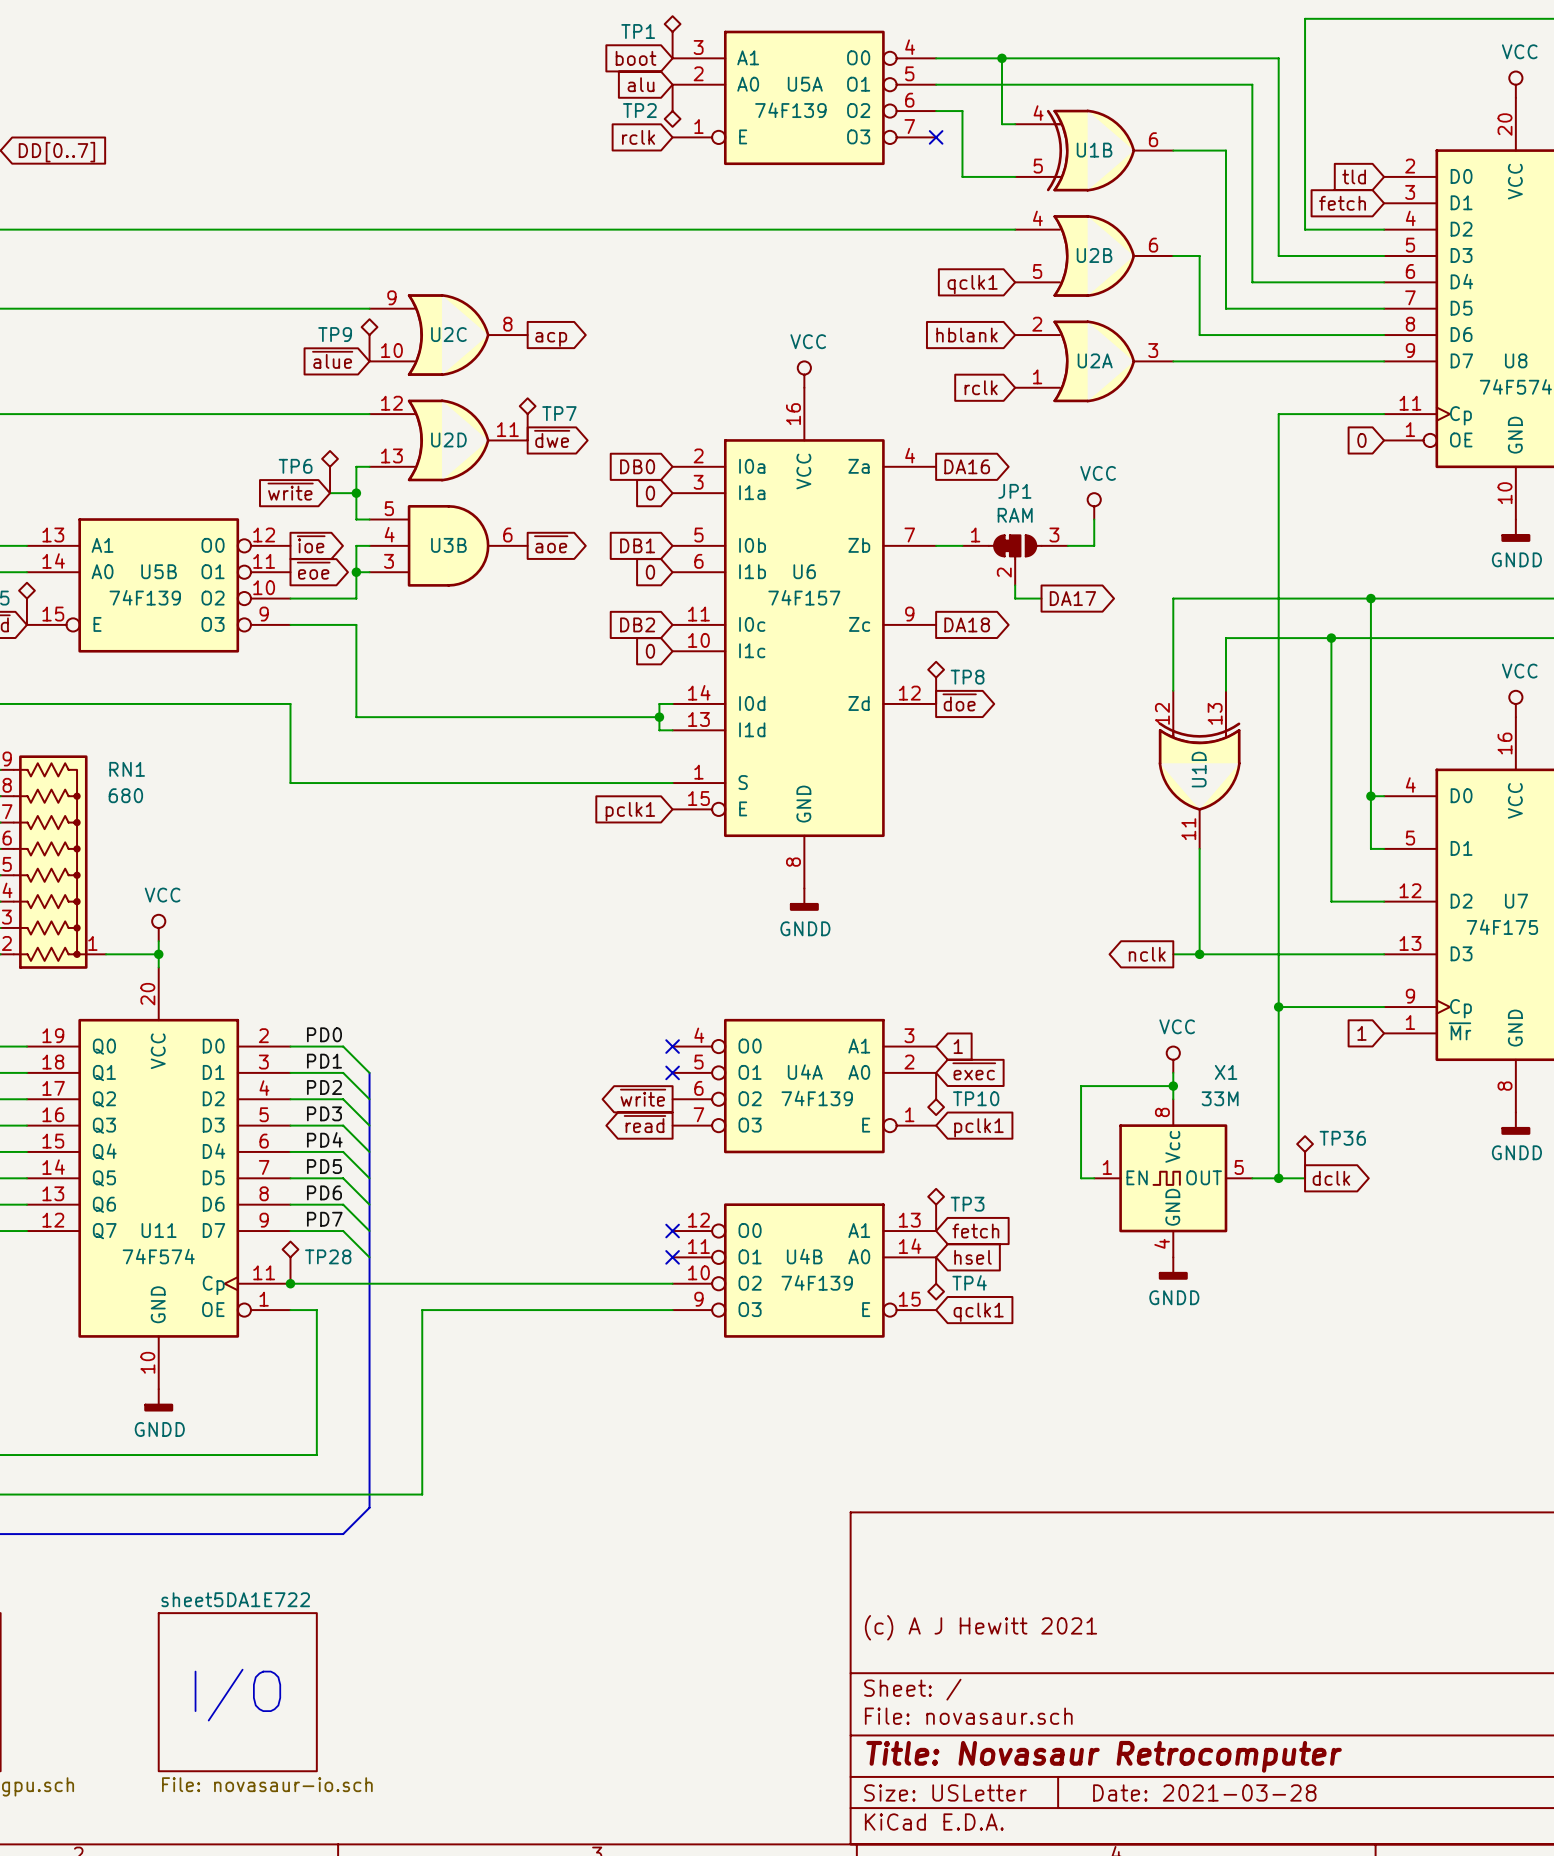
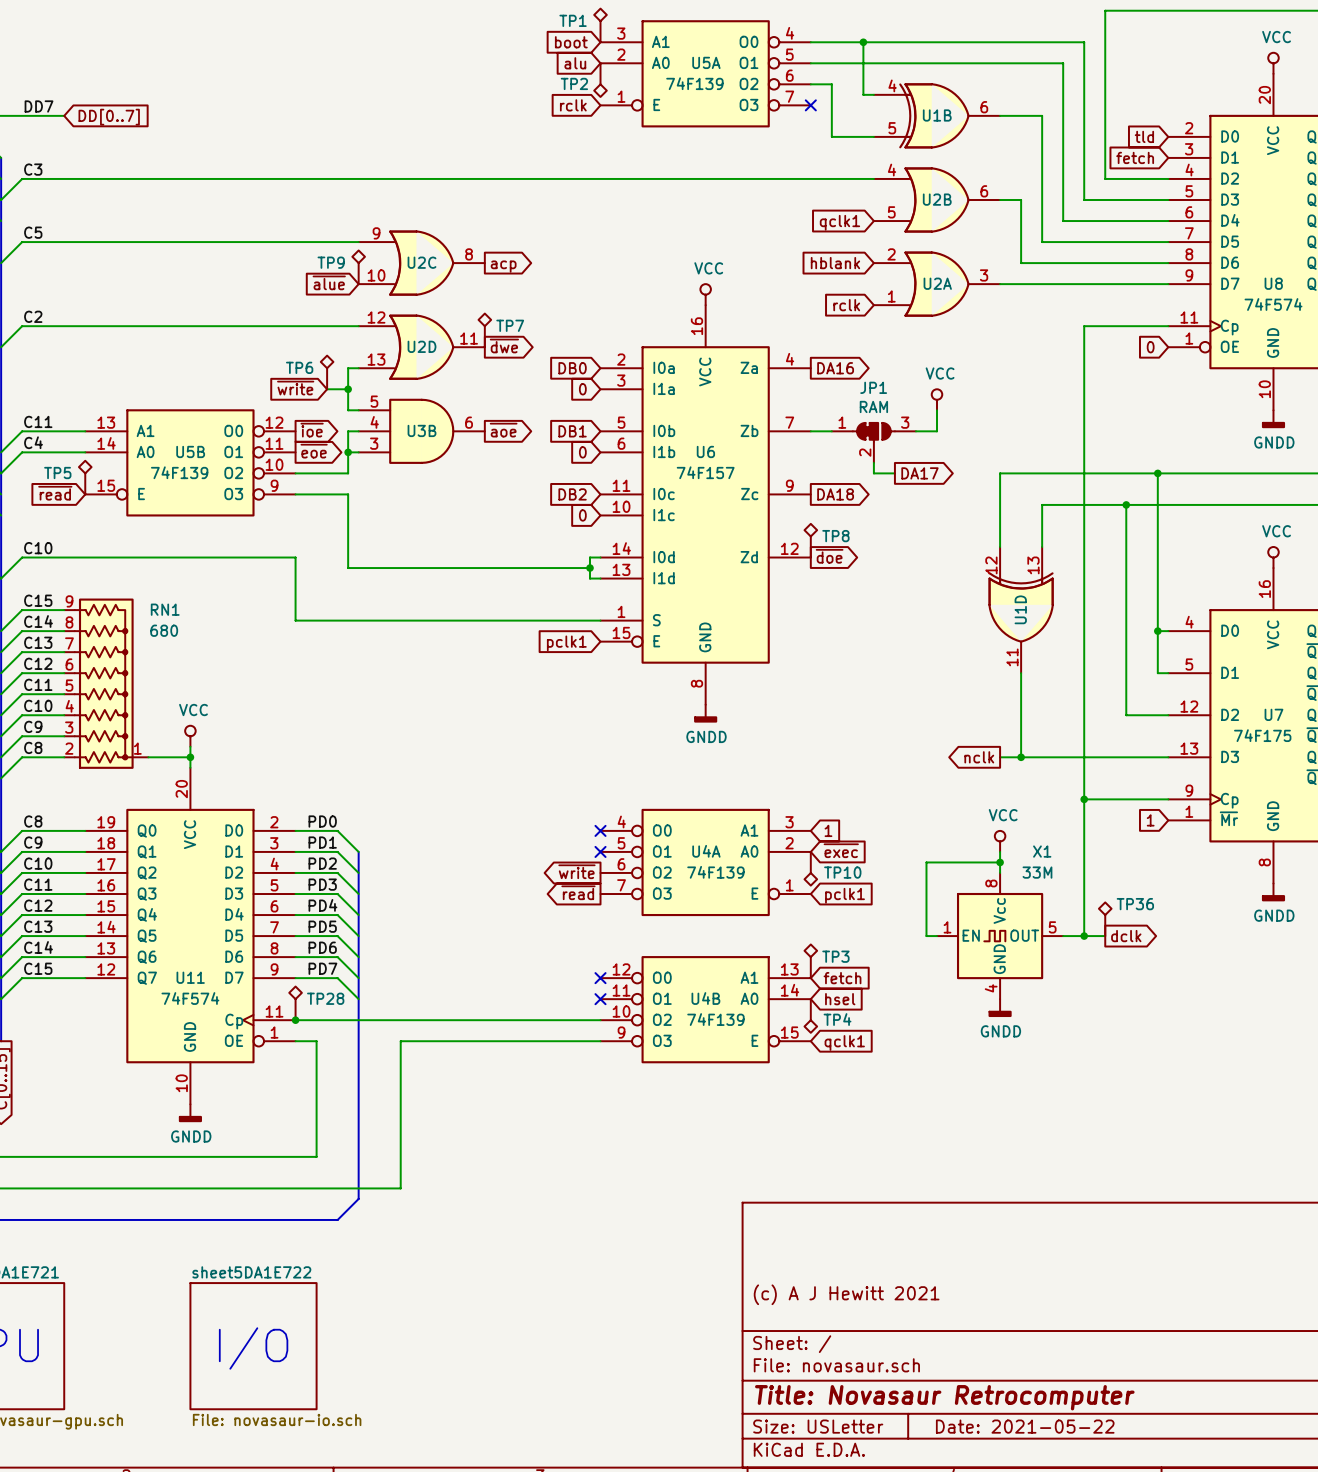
title block: Date: 2021-03-28 (1204, 1792) -> Date: 2021-05-22 (1025, 1426)

